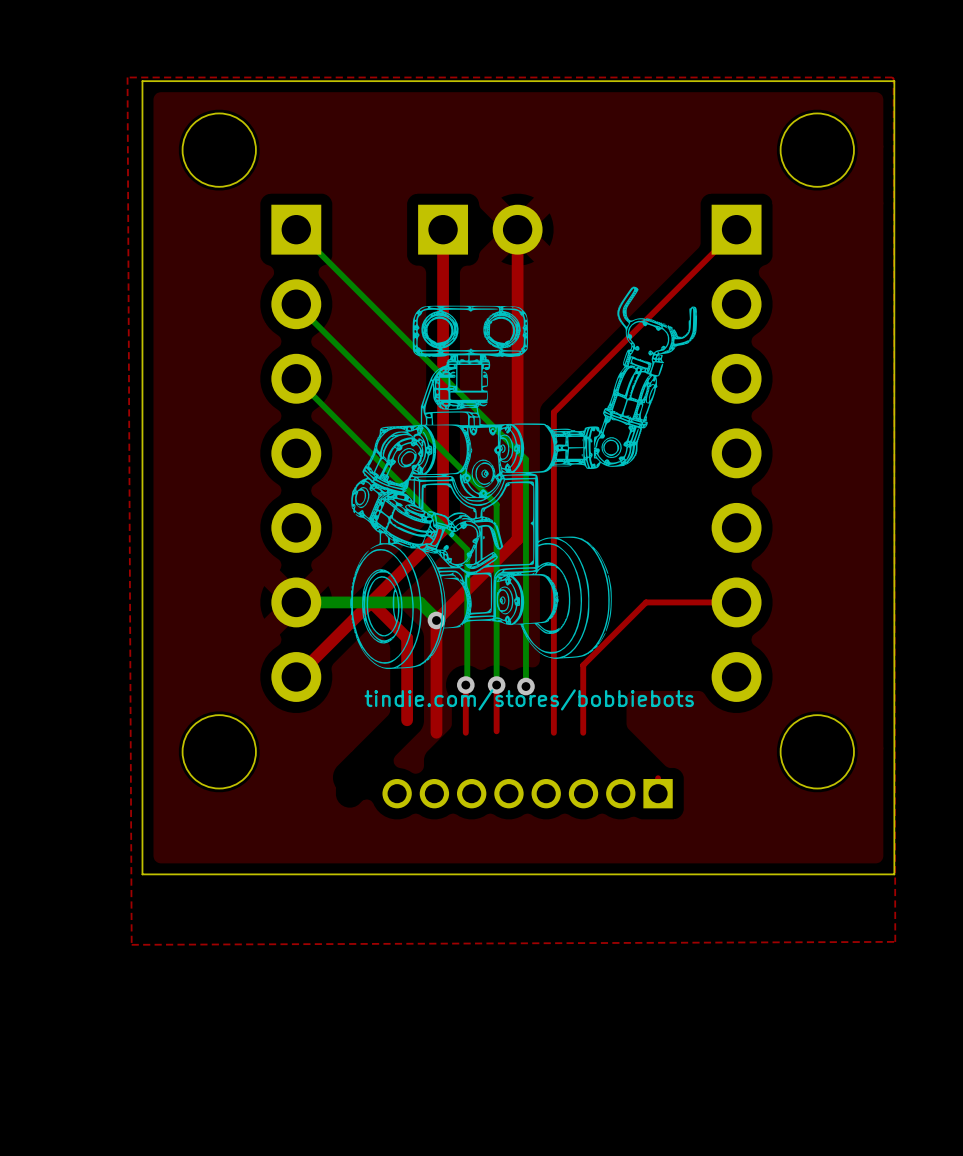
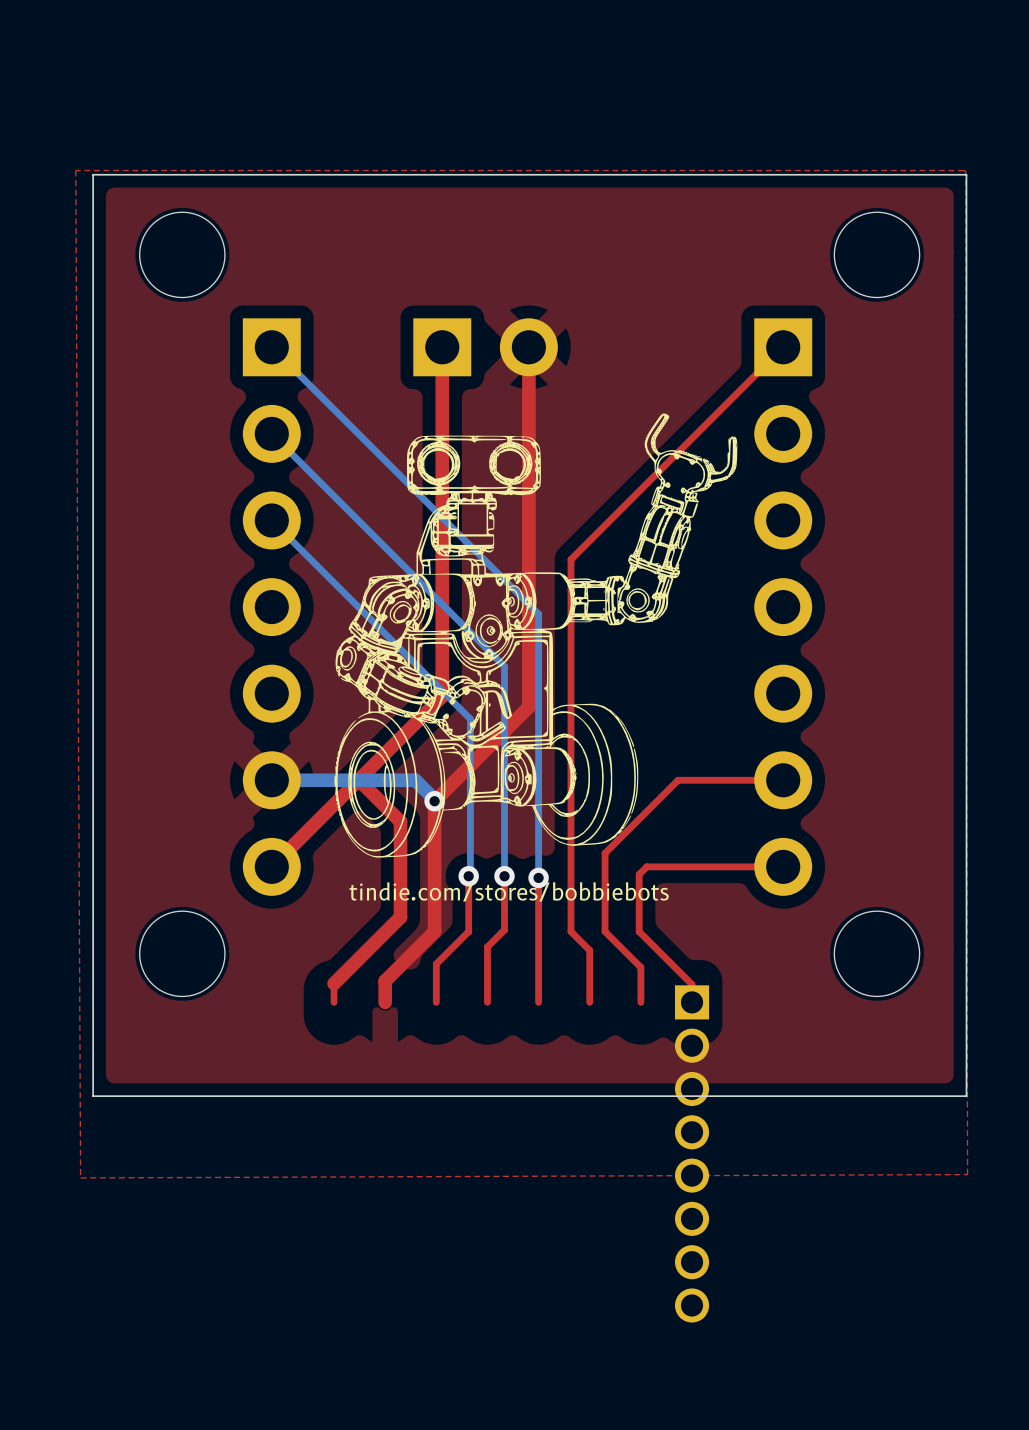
top track: none -> (783, 866) (646, 866) (639, 874) (639, 931) (692, 984)
top track: none -> (538, 877) (538, 1002)
top track: none -> (400, 917) (334, 983) (334, 1002)
top track: none -> (504, 929) (487, 946) (487, 1002)
top track: none -> (434, 931) (385, 981) (385, 1002)
top track: none -> (468, 931) (436, 964) (436, 1002)
top track: none -> (570, 931) (589, 950) (589, 1002)
top track: none -> (605, 931) (640, 967) (640, 1002)
part rotation: 0° (527, 793) -> 90° counterclockwise (692, 1153)
part position: (527, 793) -> (692, 1153)

